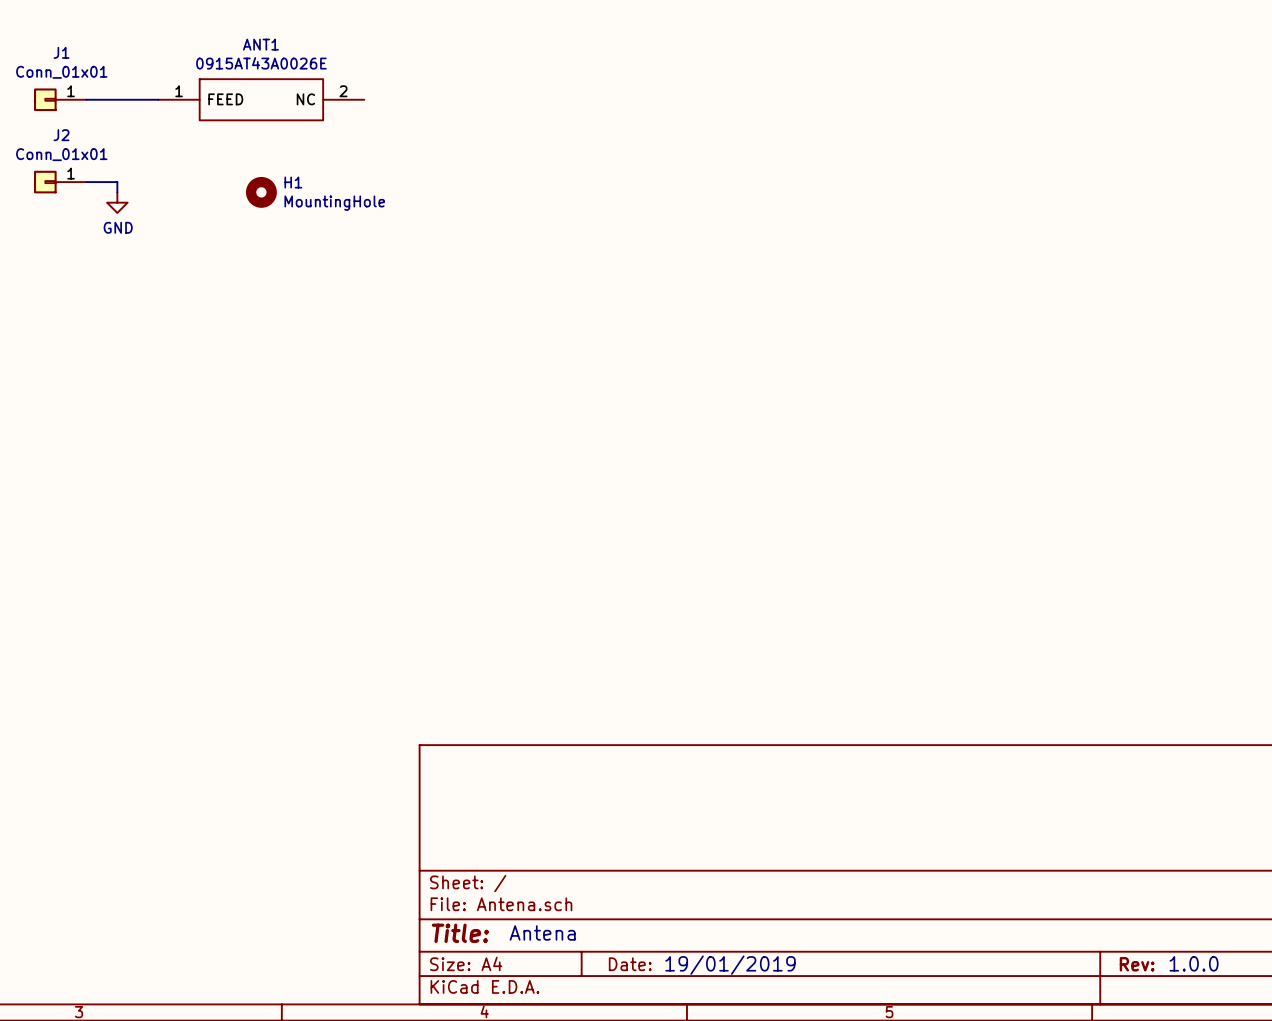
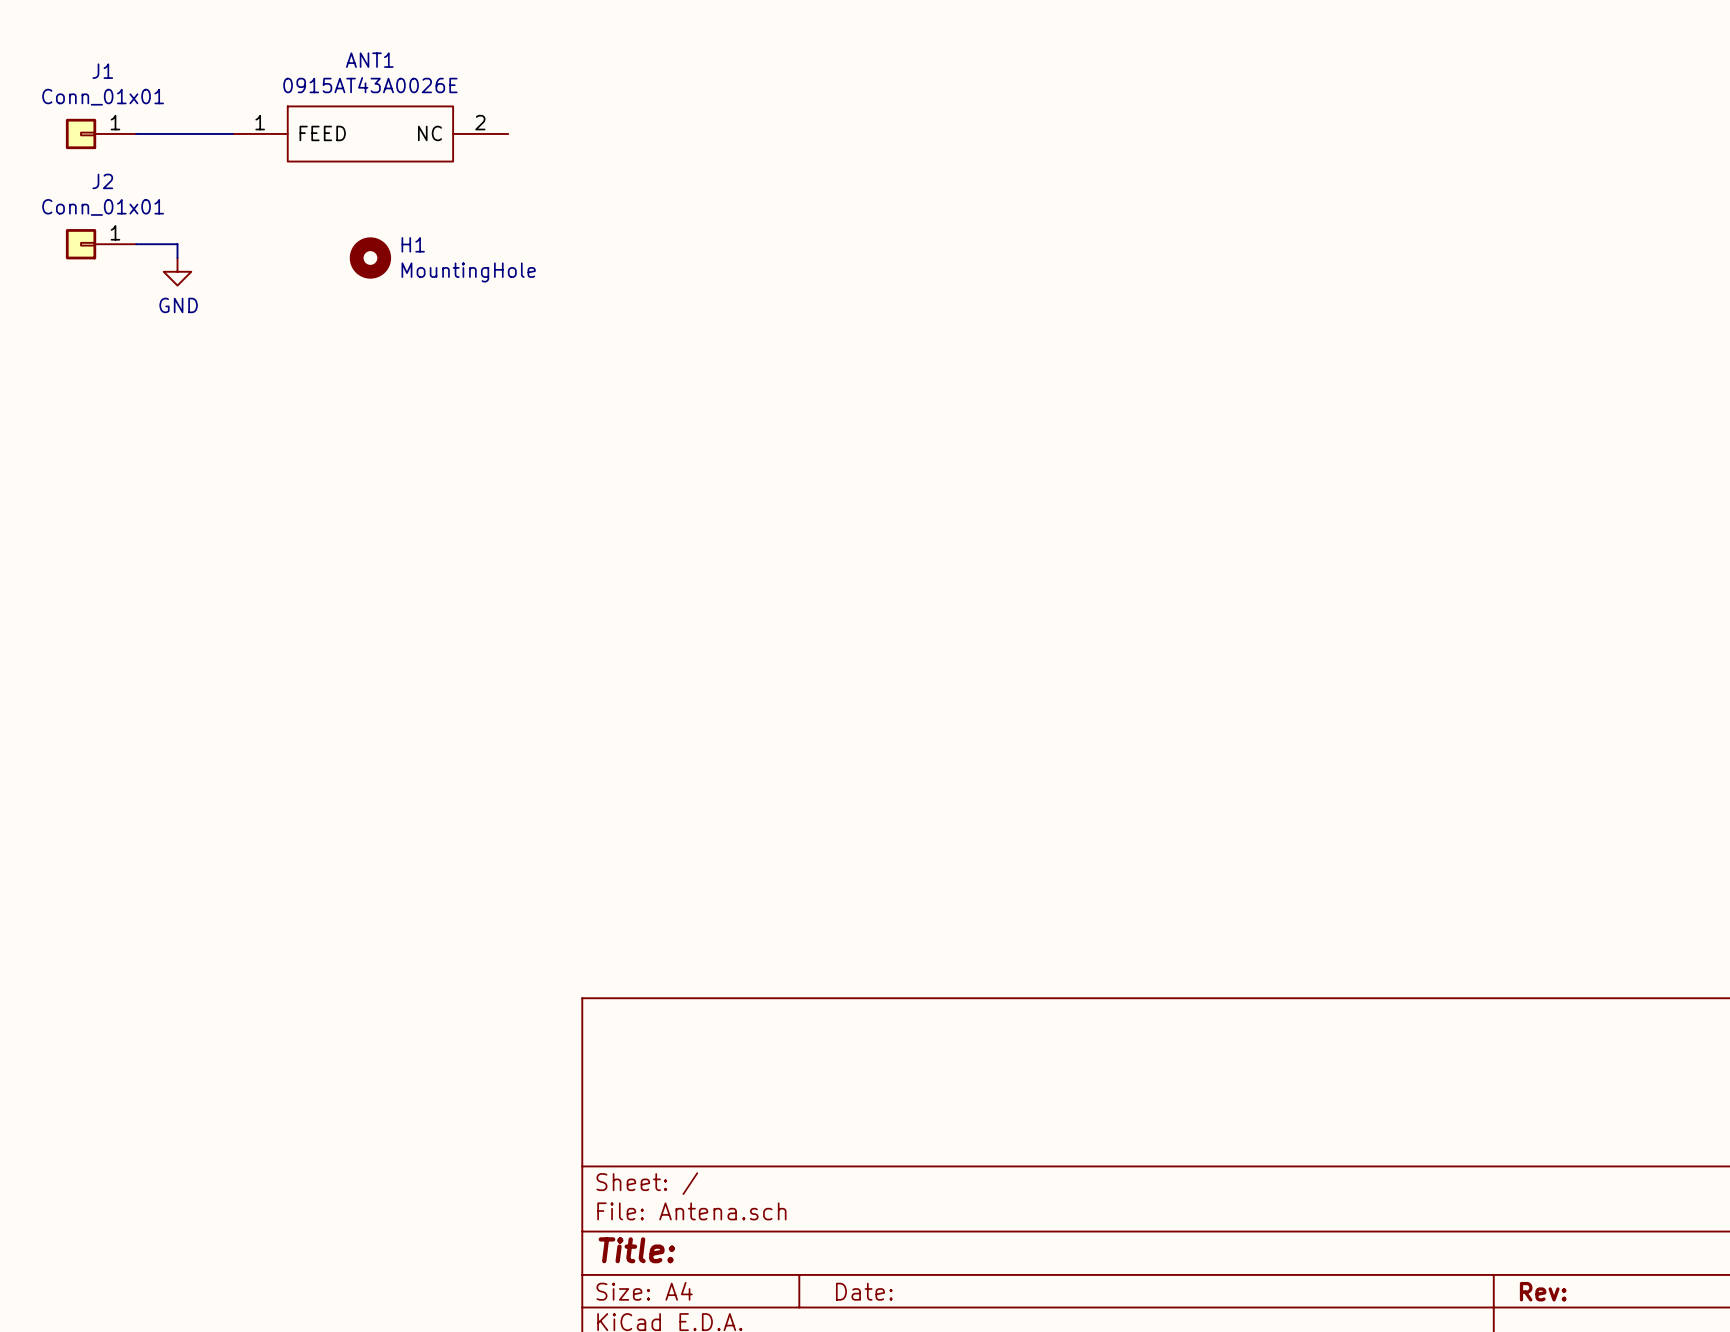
text: Antena (542, 932) -> none
text: 1.0.0 (1194, 963) -> none
text: 19/01/2019 (730, 965) -> none

